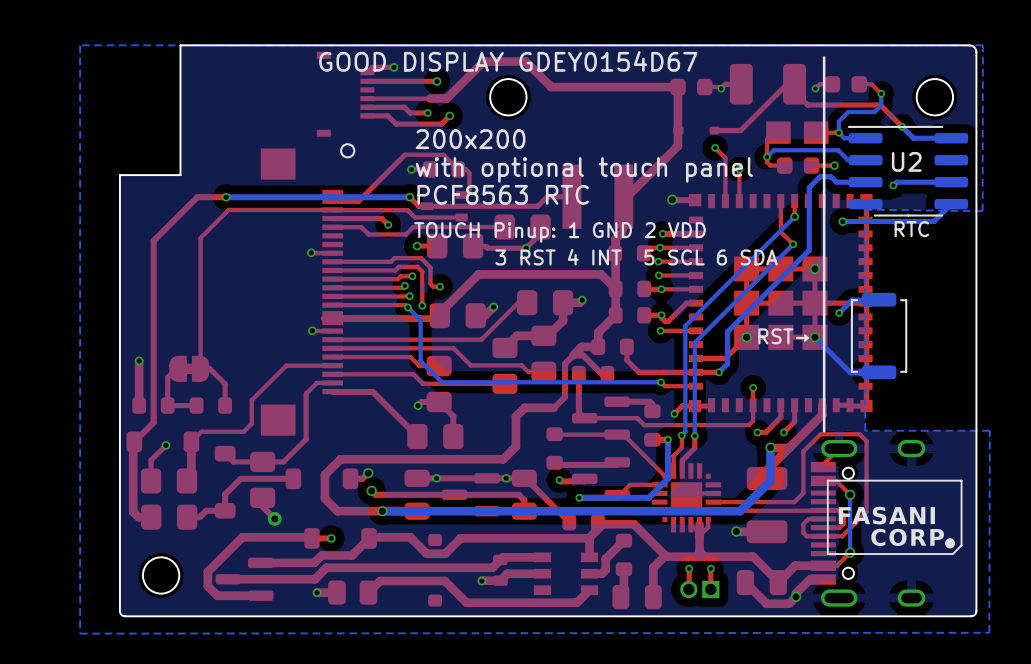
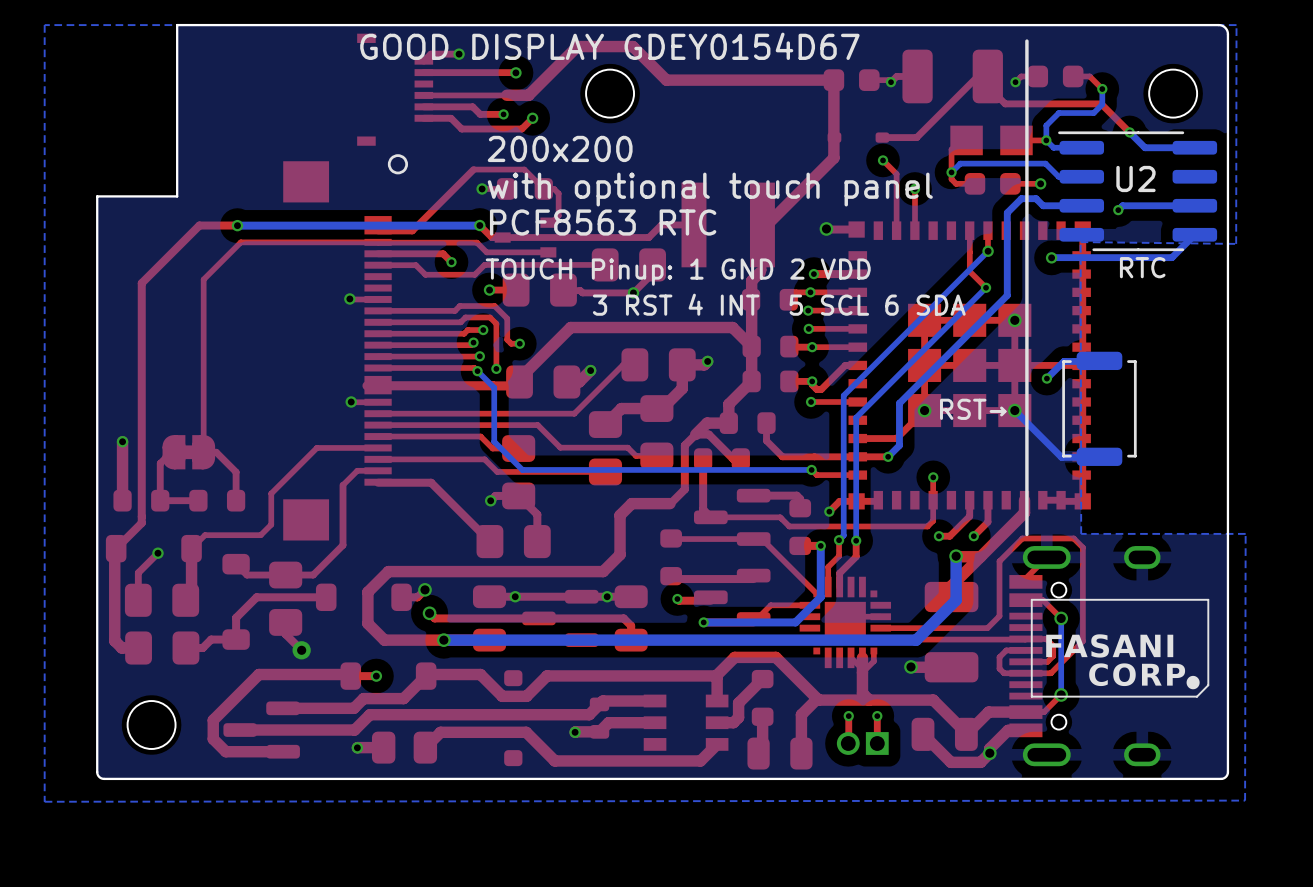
top track: (524, 478) (569, 522) -> none
part: (583, 522) -> none

